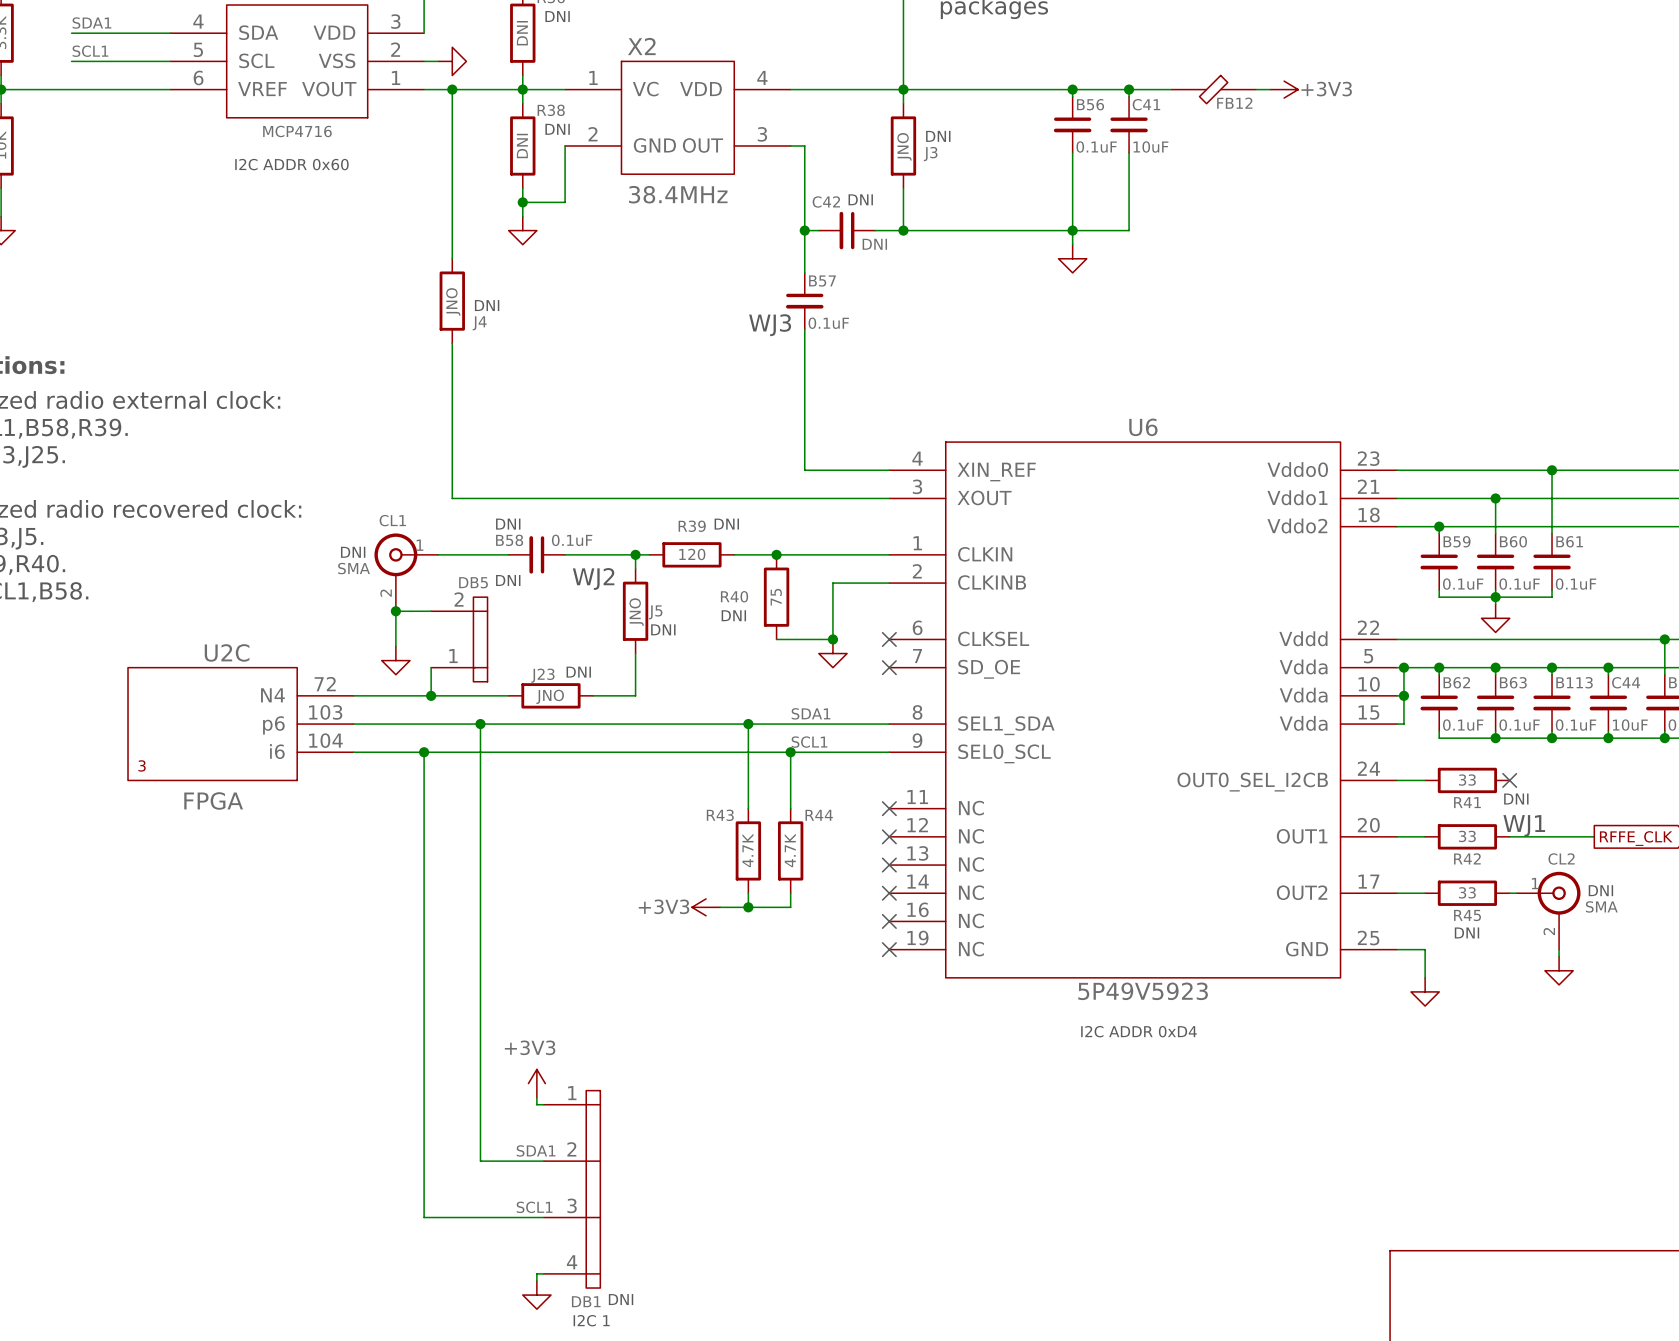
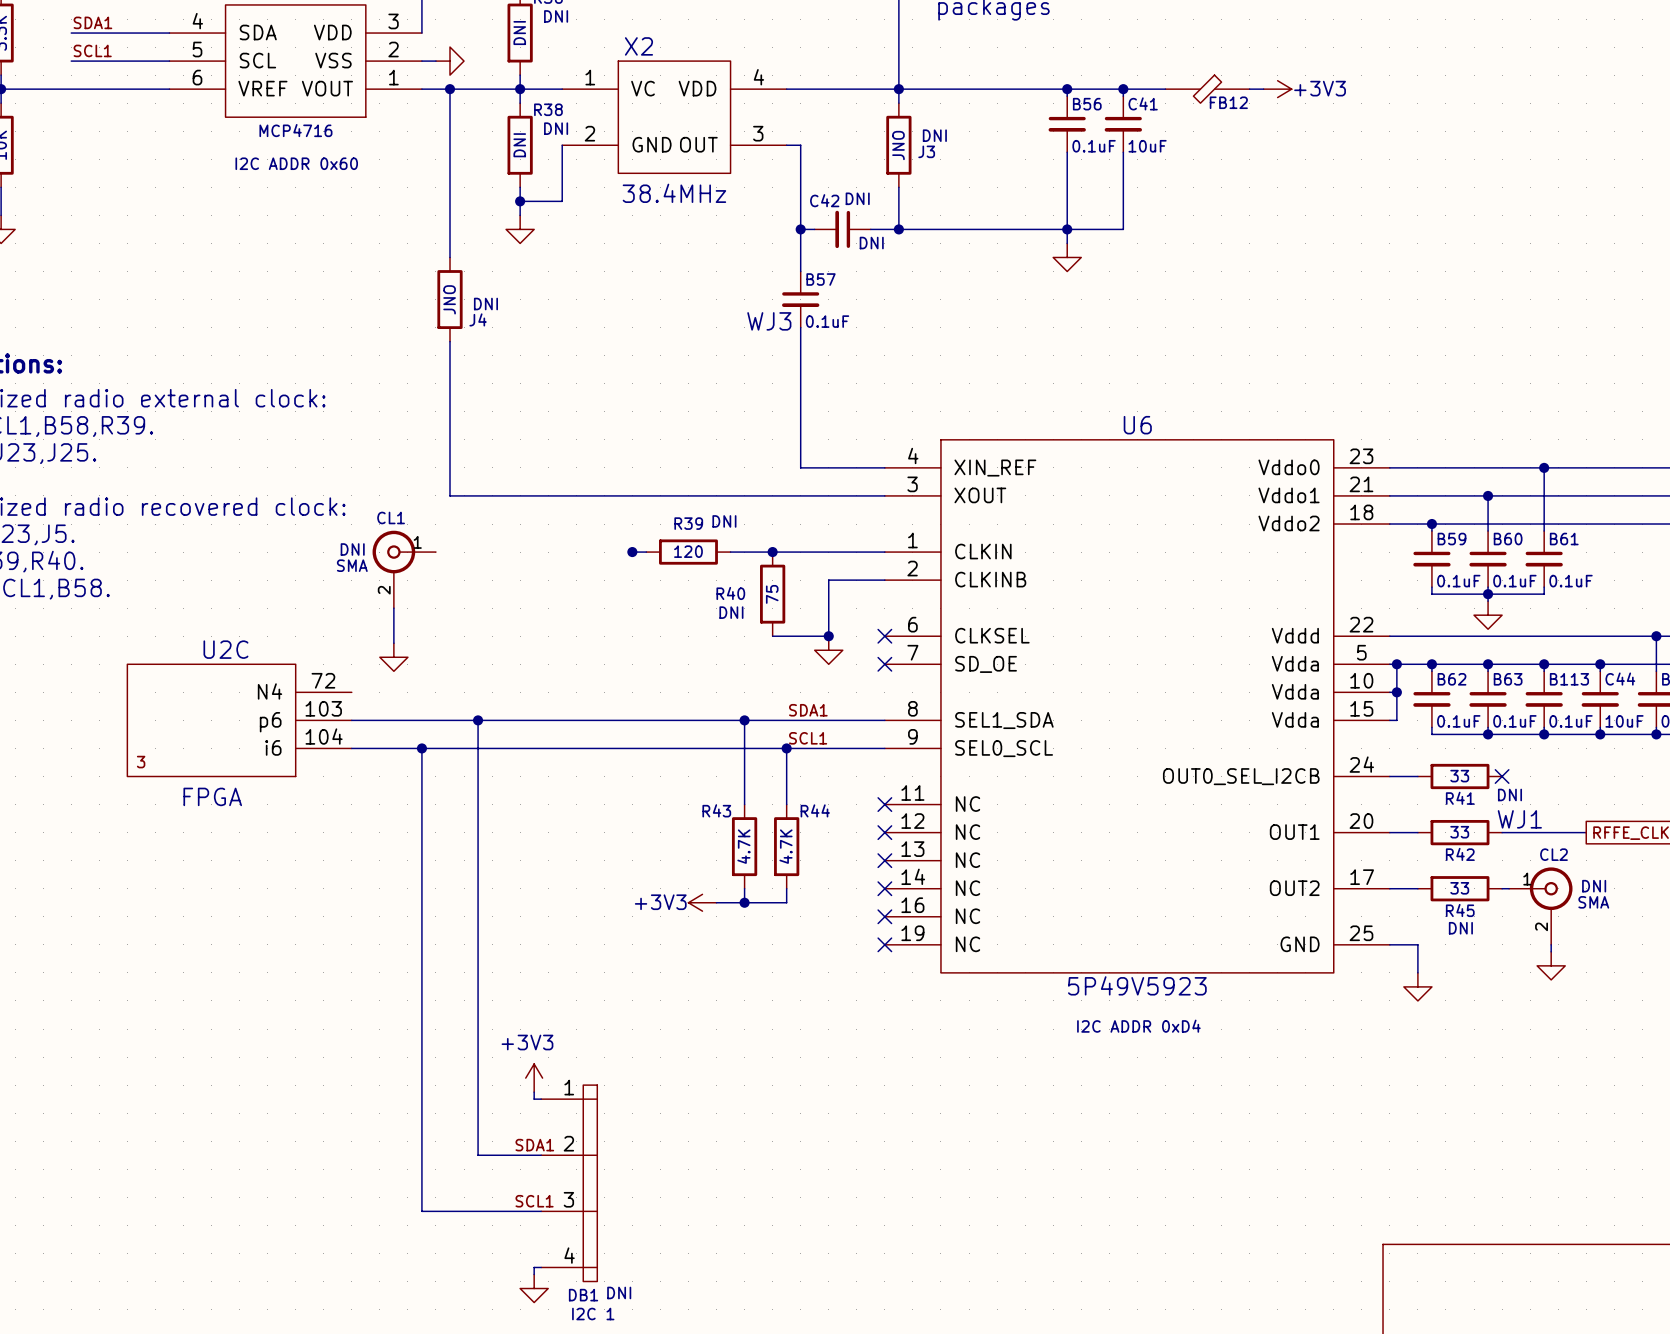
text: DNI (508, 524) -> none
wire: (438, 554) (508, 554) -> none
B58: 0.1uF (536, 554) -> none
wire: (565, 554) (635, 554) (635, 568) -> none
text: WJ2 (593, 578) -> none
text: DNI (508, 580) -> none
wire: (395, 611) (431, 611) -> none
junction: (395, 611) -> none
J5: JNO (635, 611) -> none
text: DNI (663, 629) -> none
DB5: (459, 639) -> none
wire: (635, 653) (635, 695) (593, 695) -> none
wire: (431, 667) (431, 695) -> none
text: DNI (578, 672) -> none
wire: (353, 695) (508, 695) -> none
junction: (431, 695) -> none
J23: JNO (550, 695) -> none

